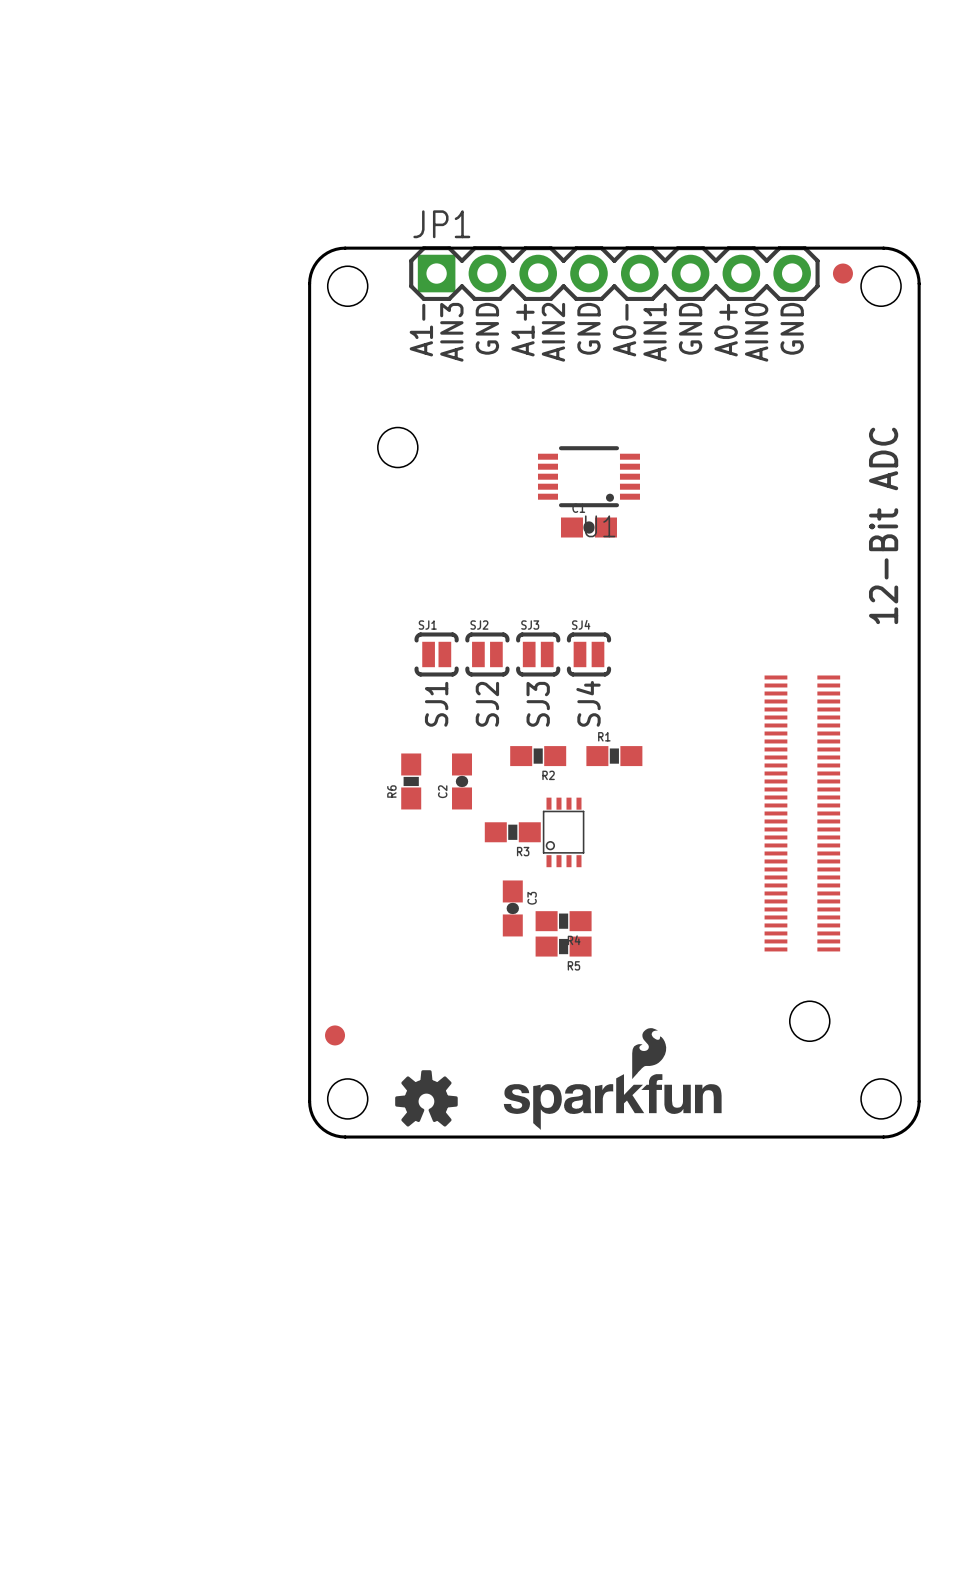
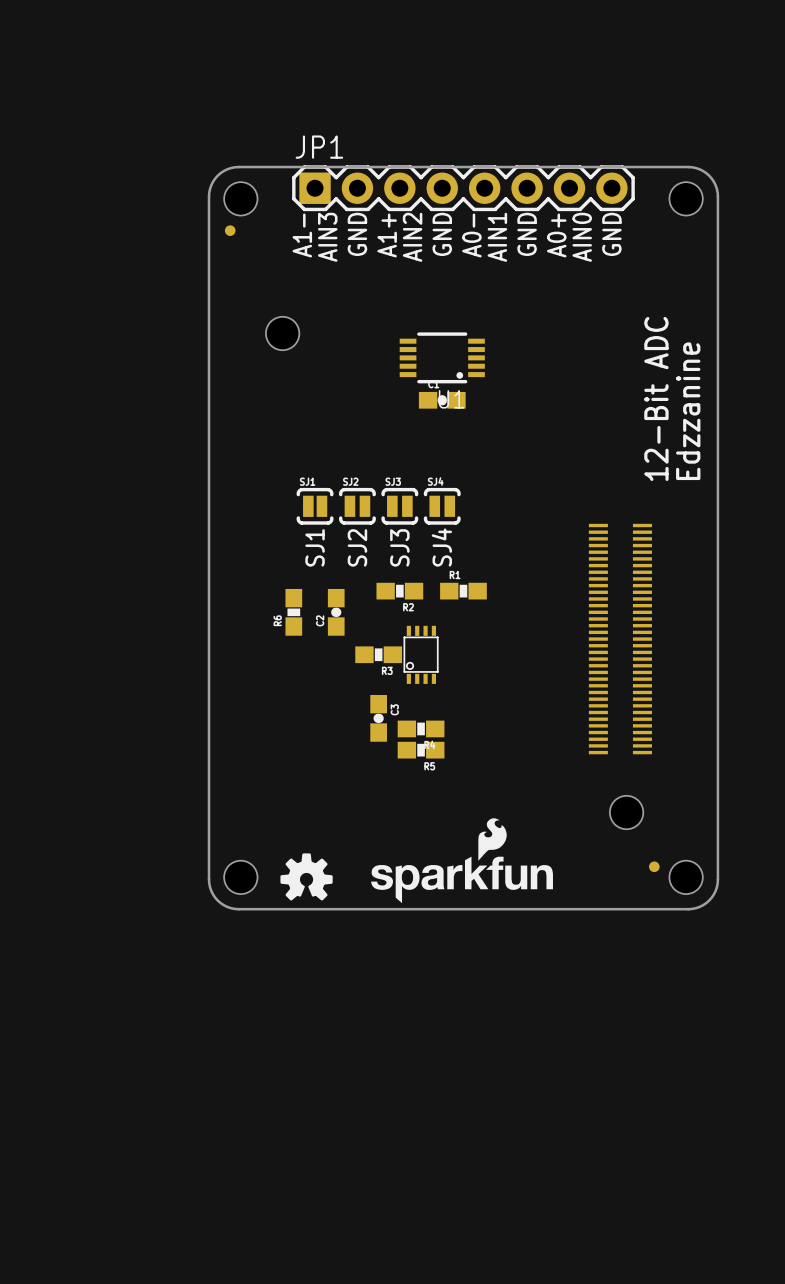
part: (842, 273) -> none
part: none -> (230, 230)
text: none -> 12-Bit ADC (656, 398)
text: 12-Bit ADC (883, 525) -> Edzzanine (688, 411)
part: (335, 1035) -> none
part: none -> (654, 866)

